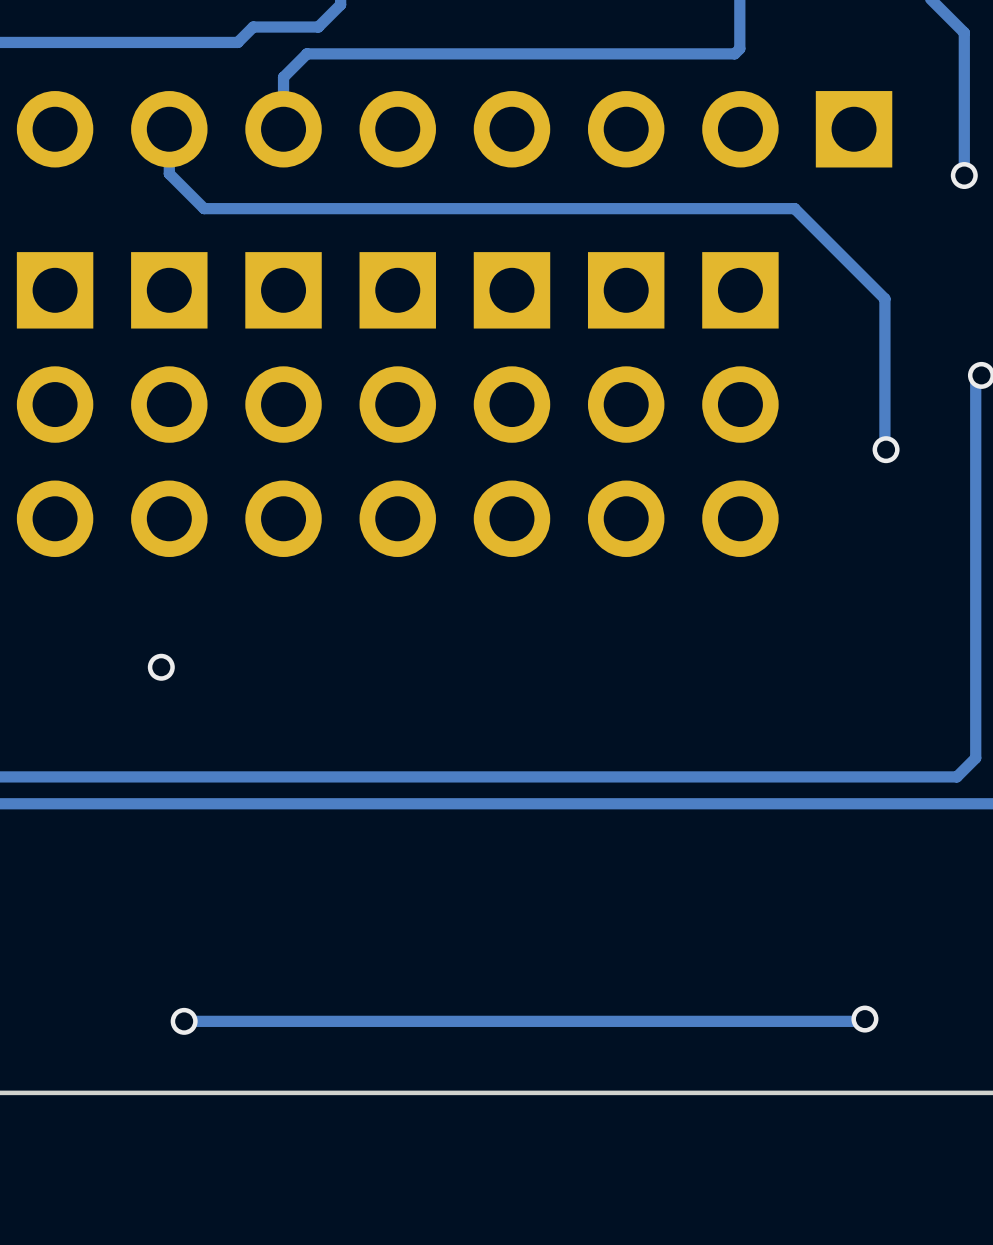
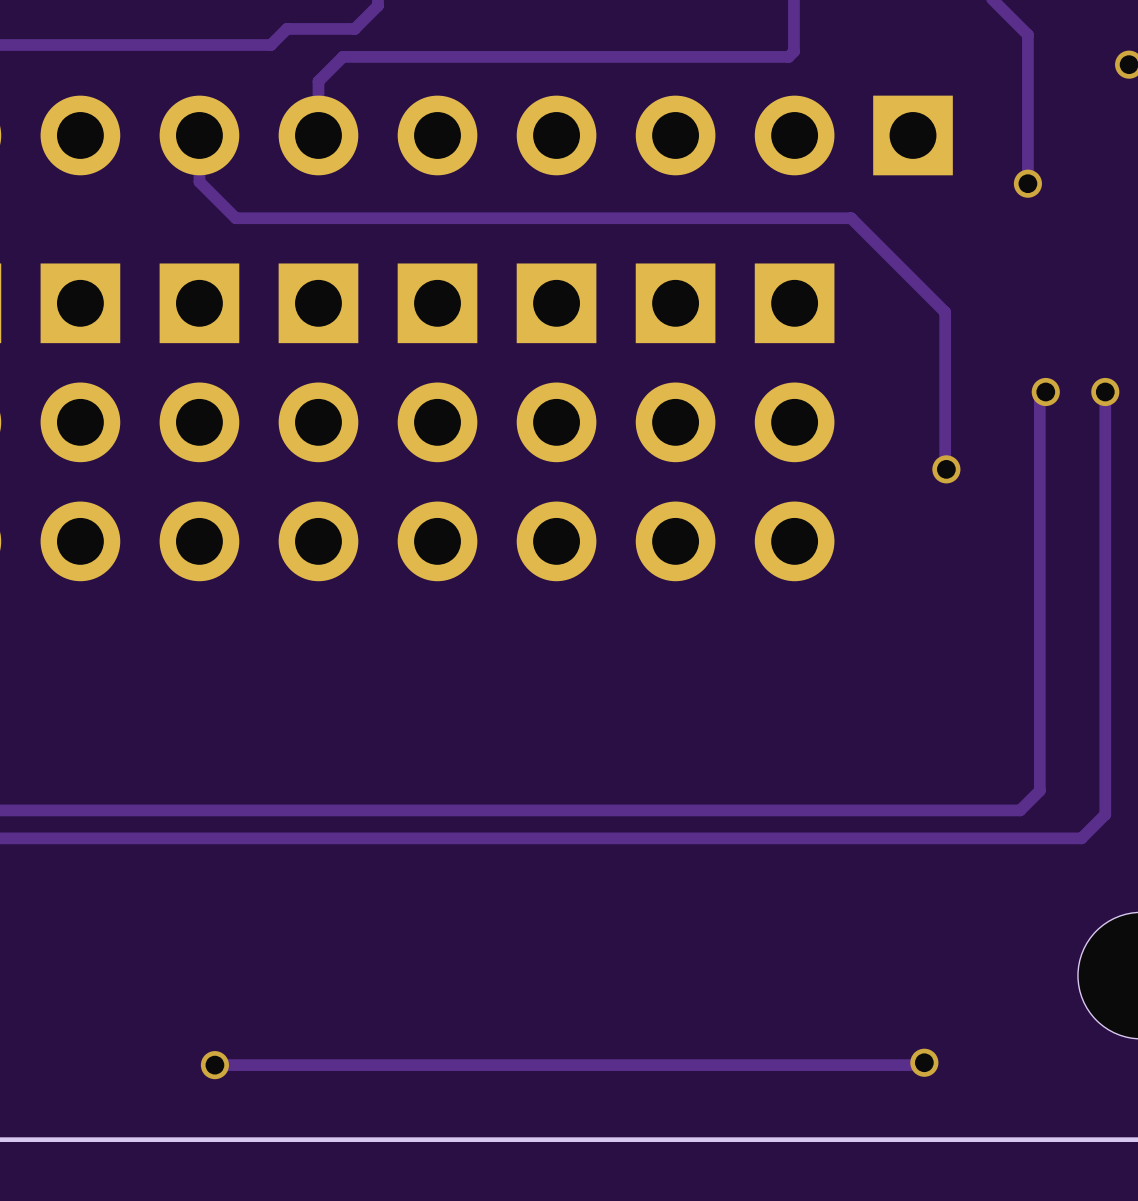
via: (161, 667) -> none

